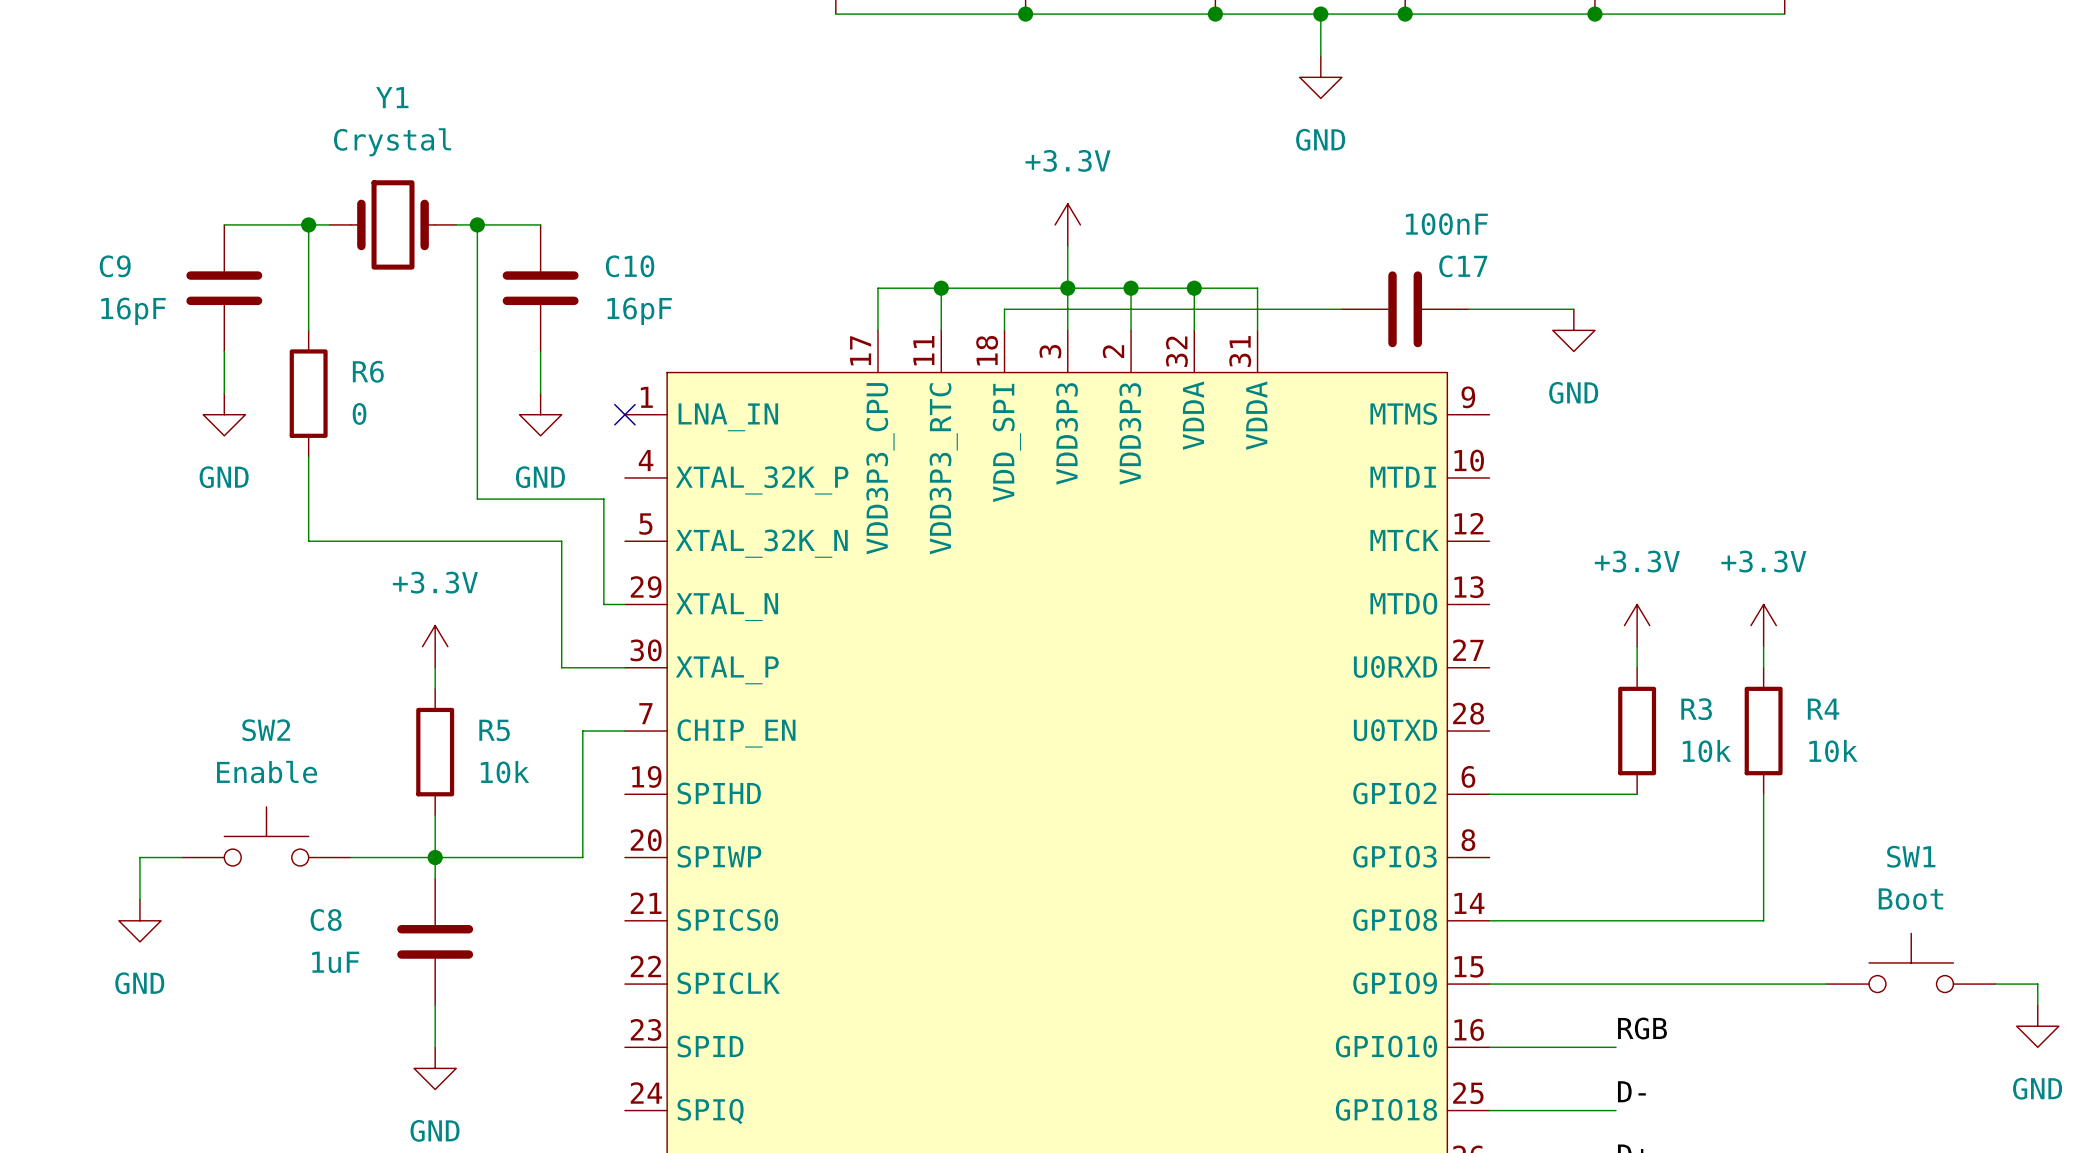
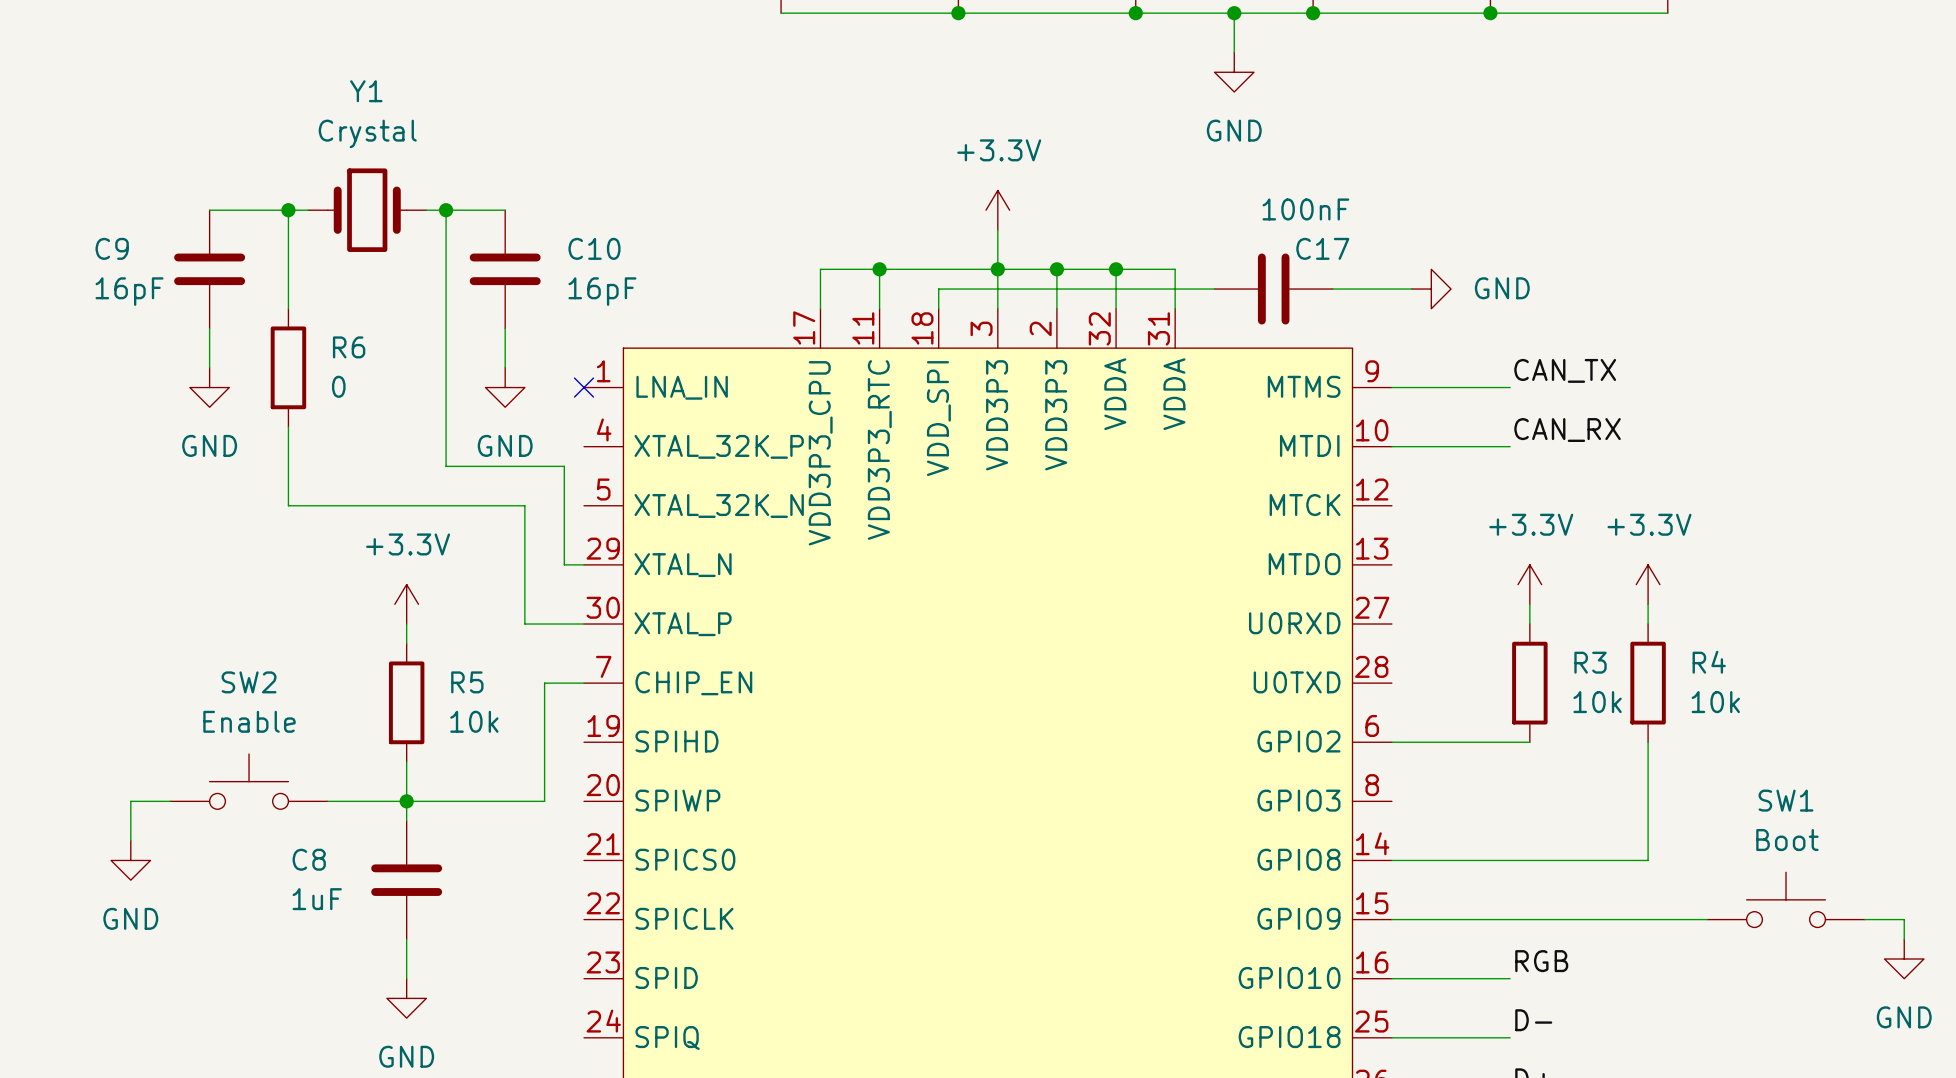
C17 position: (1405, 309) -> (1273, 289)
wire: (1510, 309) (1573, 309) -> none
power symbol rotation: 0° (1573, 330) -> 90° counterclockwise (1431, 289)
power symbol position: GND (1573, 330) -> GND (1431, 289)
label: none -> CAN_TX (1565, 370)
wire: none -> (1391, 387) (1510, 387)
label: none -> CAN_RX (1567, 430)
wire: none -> (1391, 446) (1510, 446)

